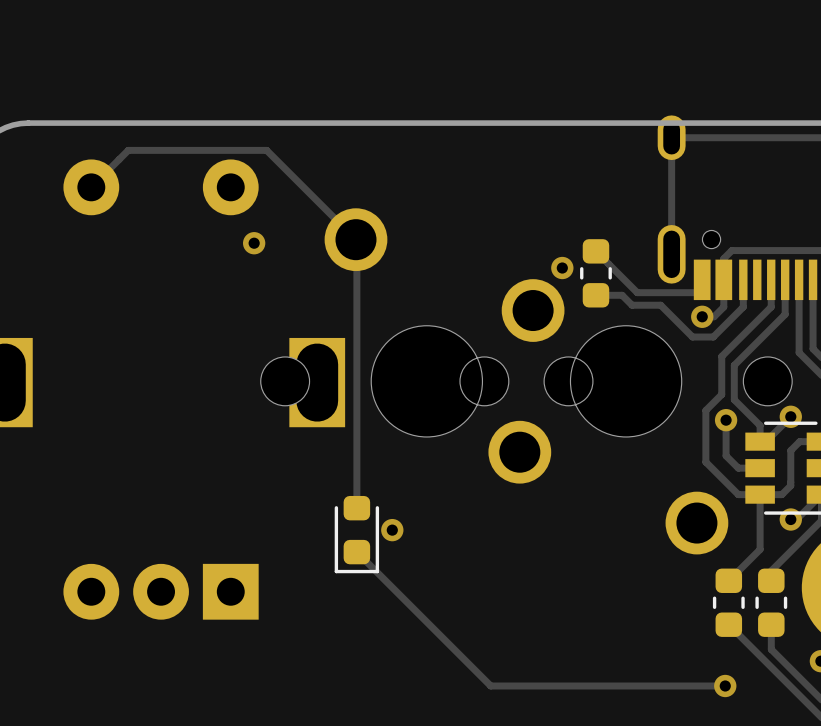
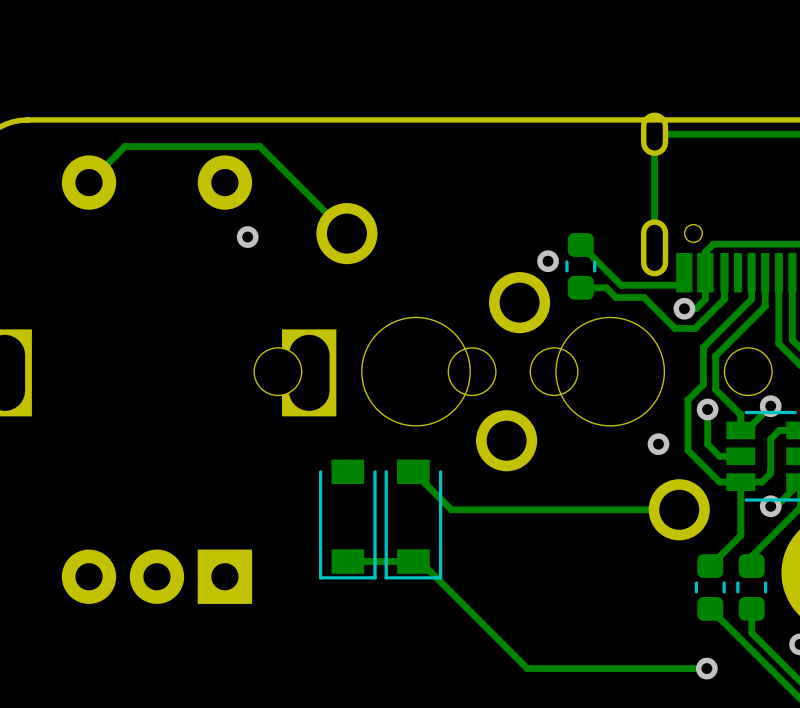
track: (356, 240) (356, 508) -> none
via: none -> (658, 444)
track: none -> (413, 471) (451, 509) (679, 509)
part footprint: [334, 495, 380, 574] -> [319, 459, 377, 580]
via: (392, 530) -> none
part: none -> (413, 519)
track: (356, 552) (490, 685) (541, 685) -> (347, 561) (420, 561) (527, 668)

